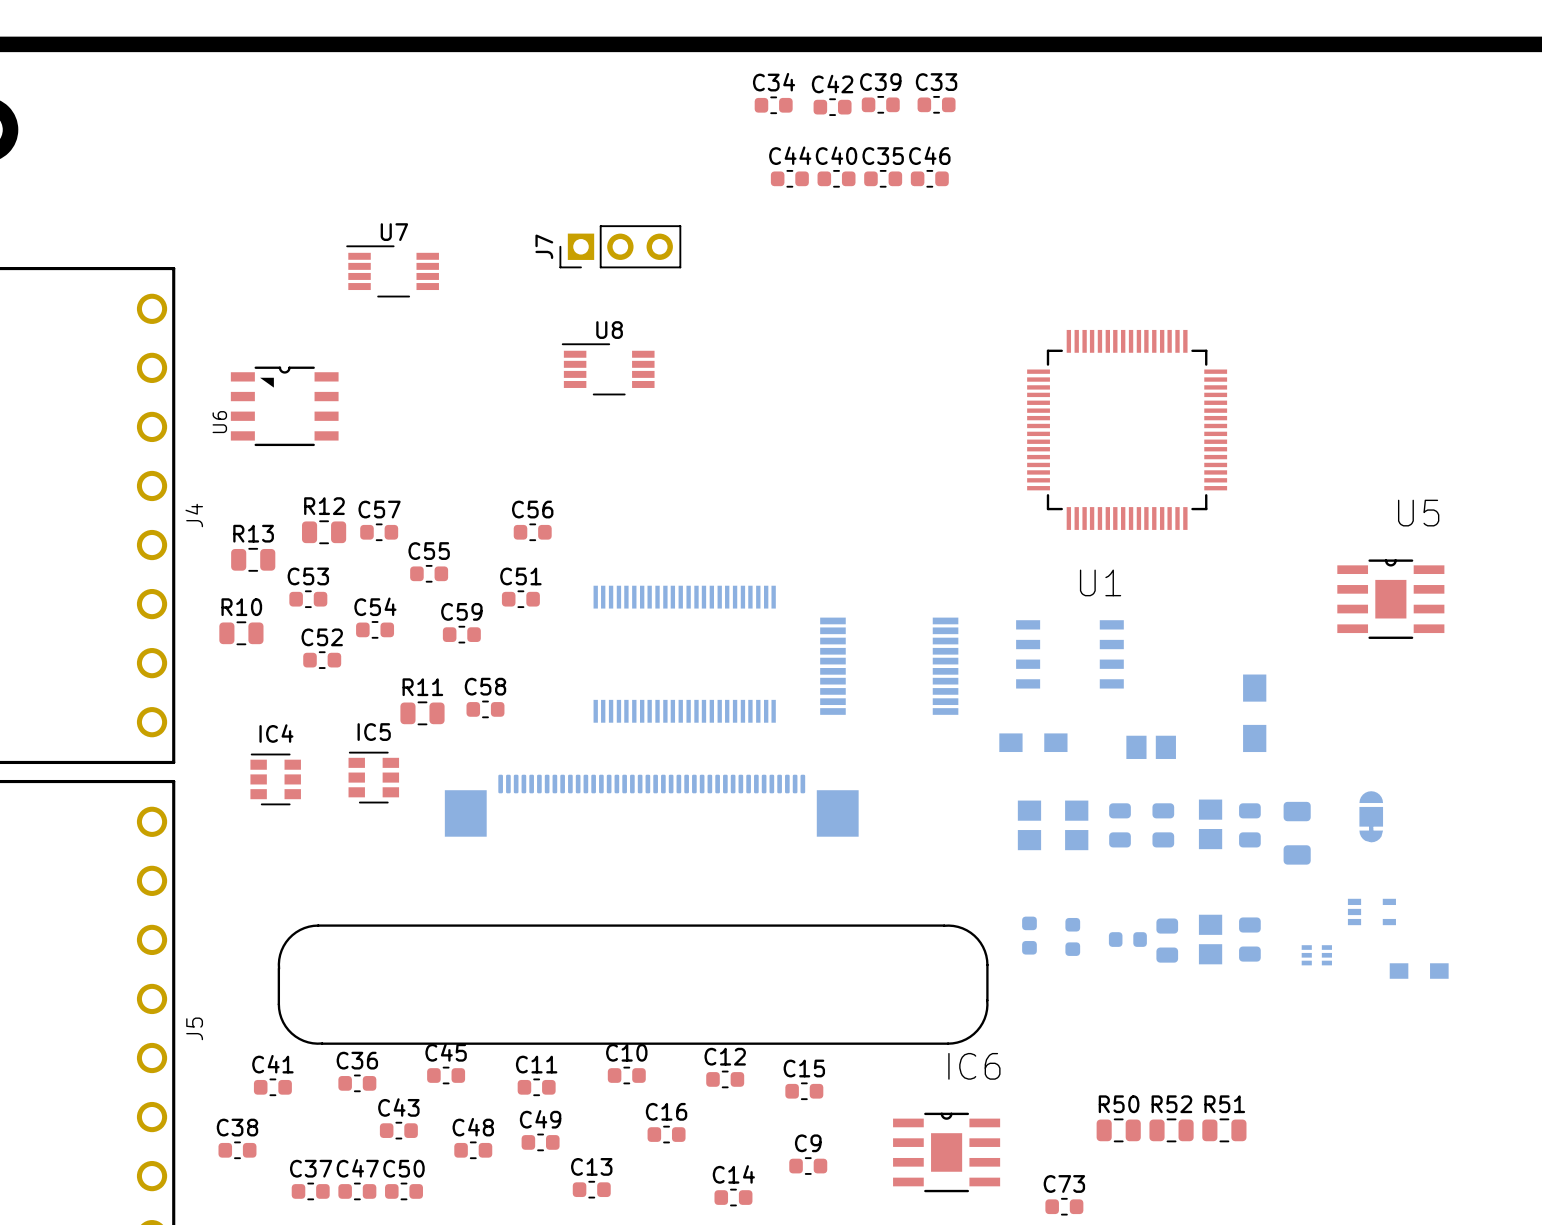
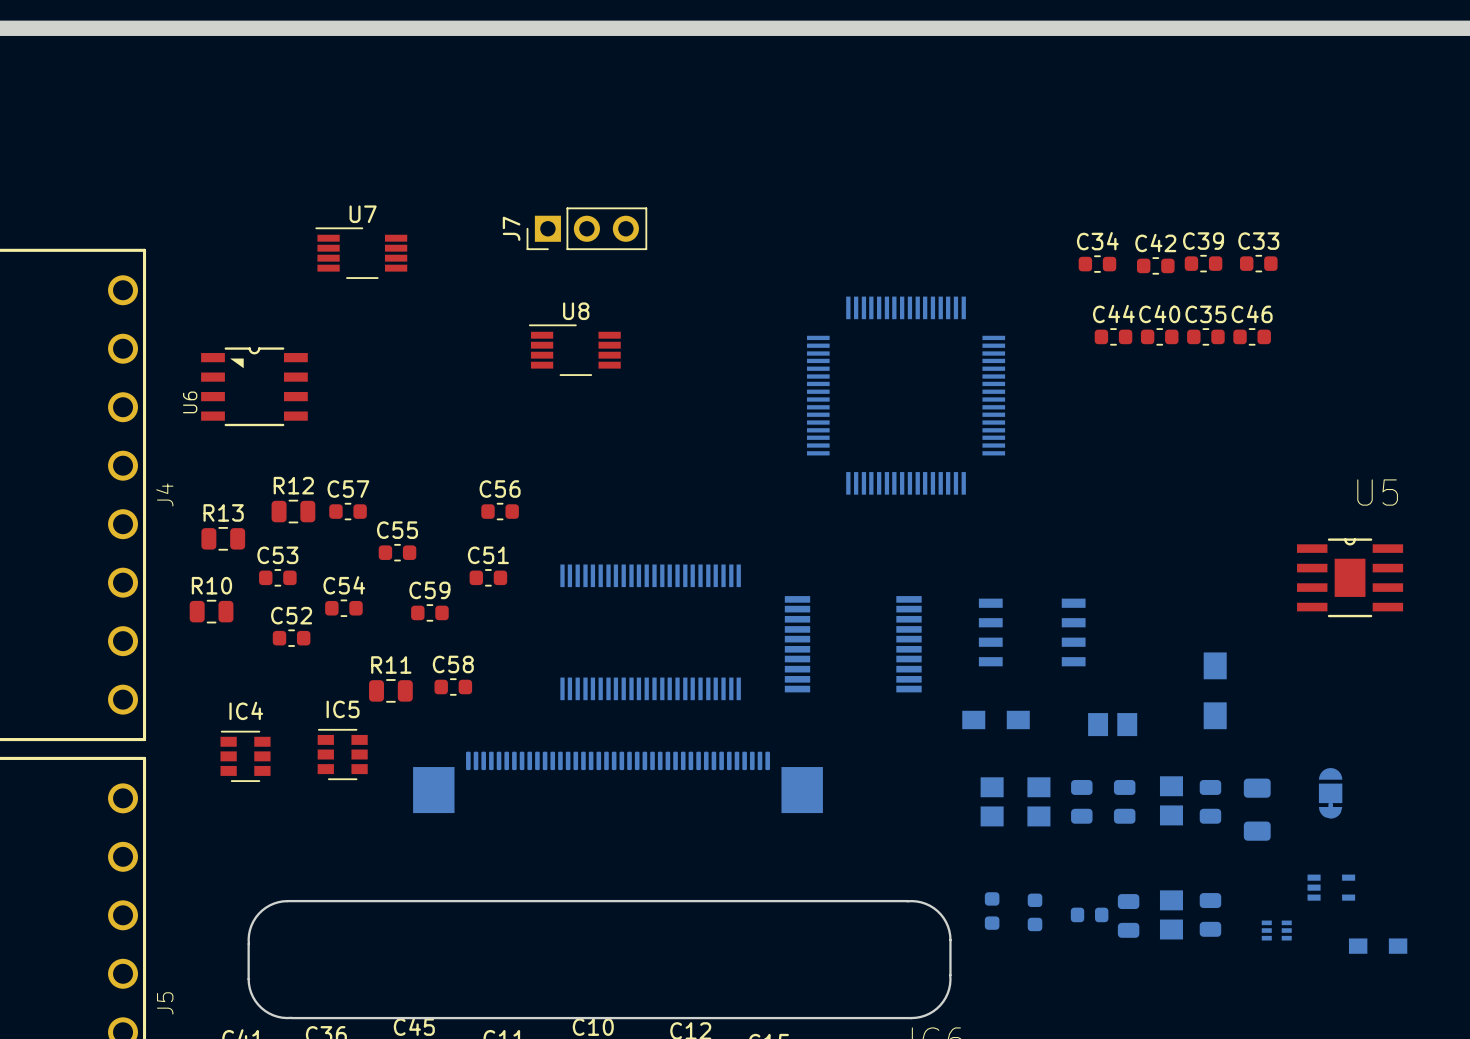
C39 position: (880, 104) -> (1203, 263)
C33 position: (936, 104) -> (1258, 263)
C34 position: (773, 105) -> (1097, 264)
C42 position: (832, 107) -> (1155, 265)
C44 position: (789, 178) -> (1113, 336)
C40 position: (836, 178) -> (1159, 336)
C35 position: (883, 178) -> (1205, 336)
C46 position: (929, 178) -> (1252, 336)
U1 side: top (1127, 429) -> bottom (906, 395)

